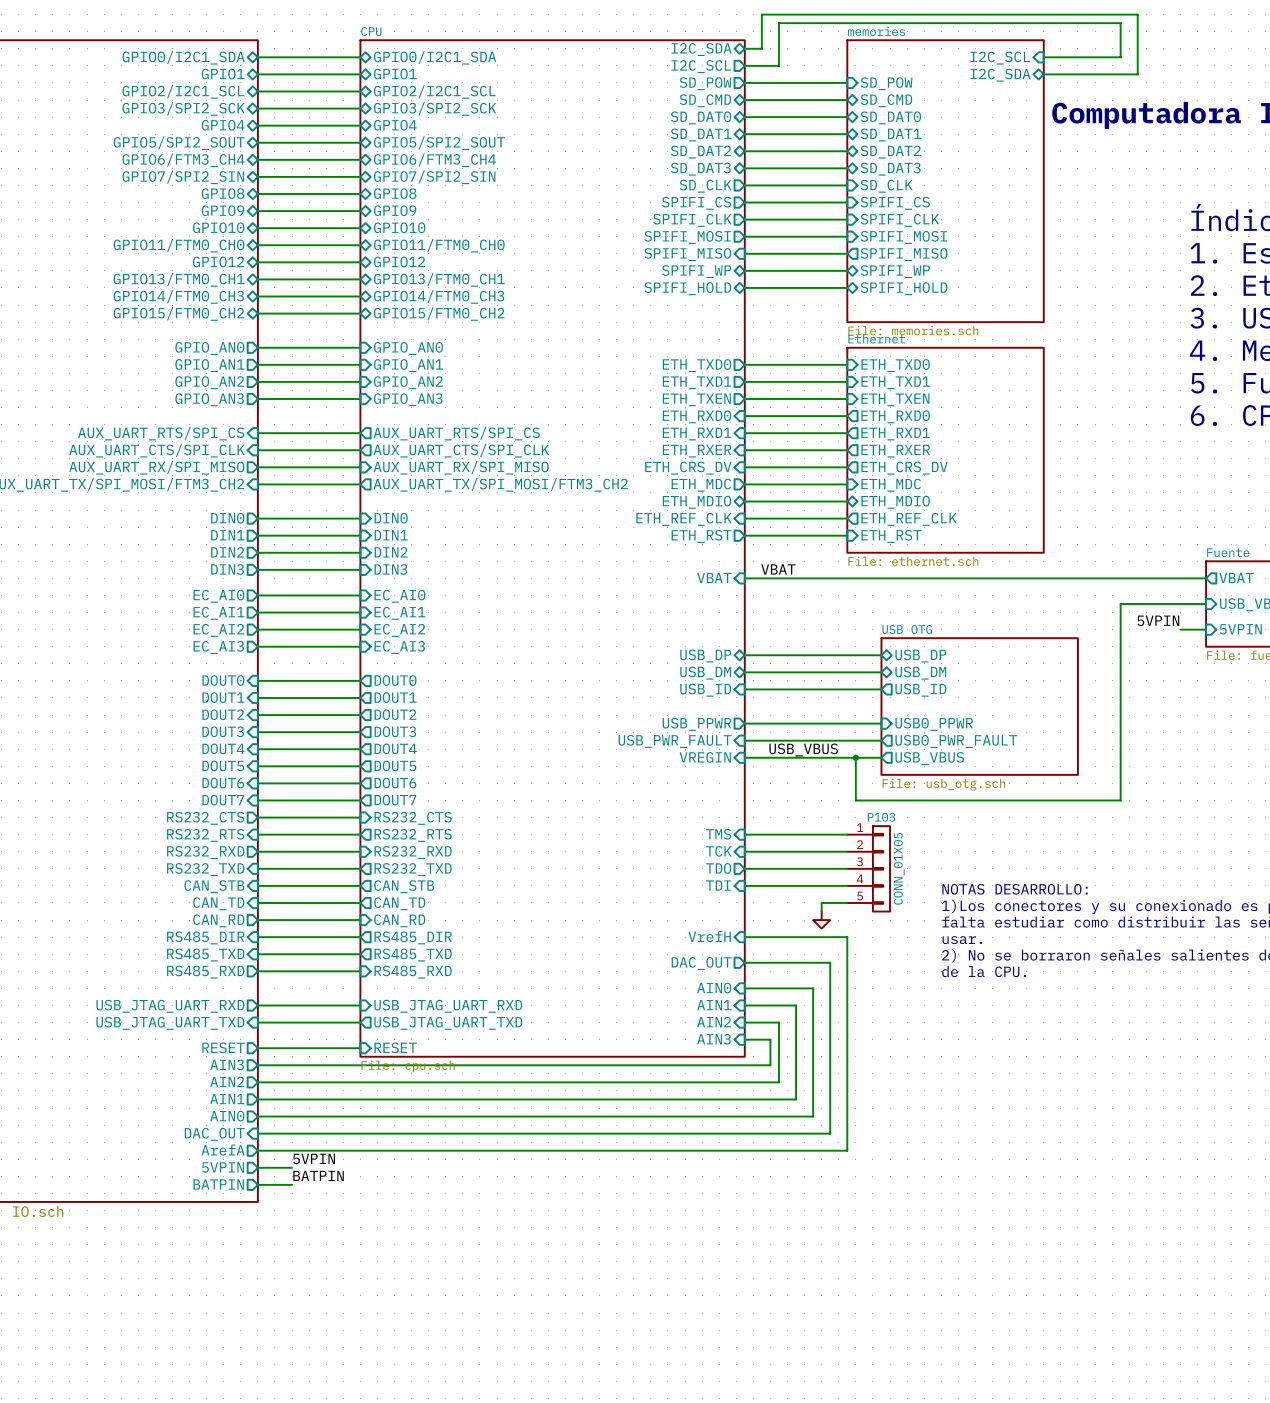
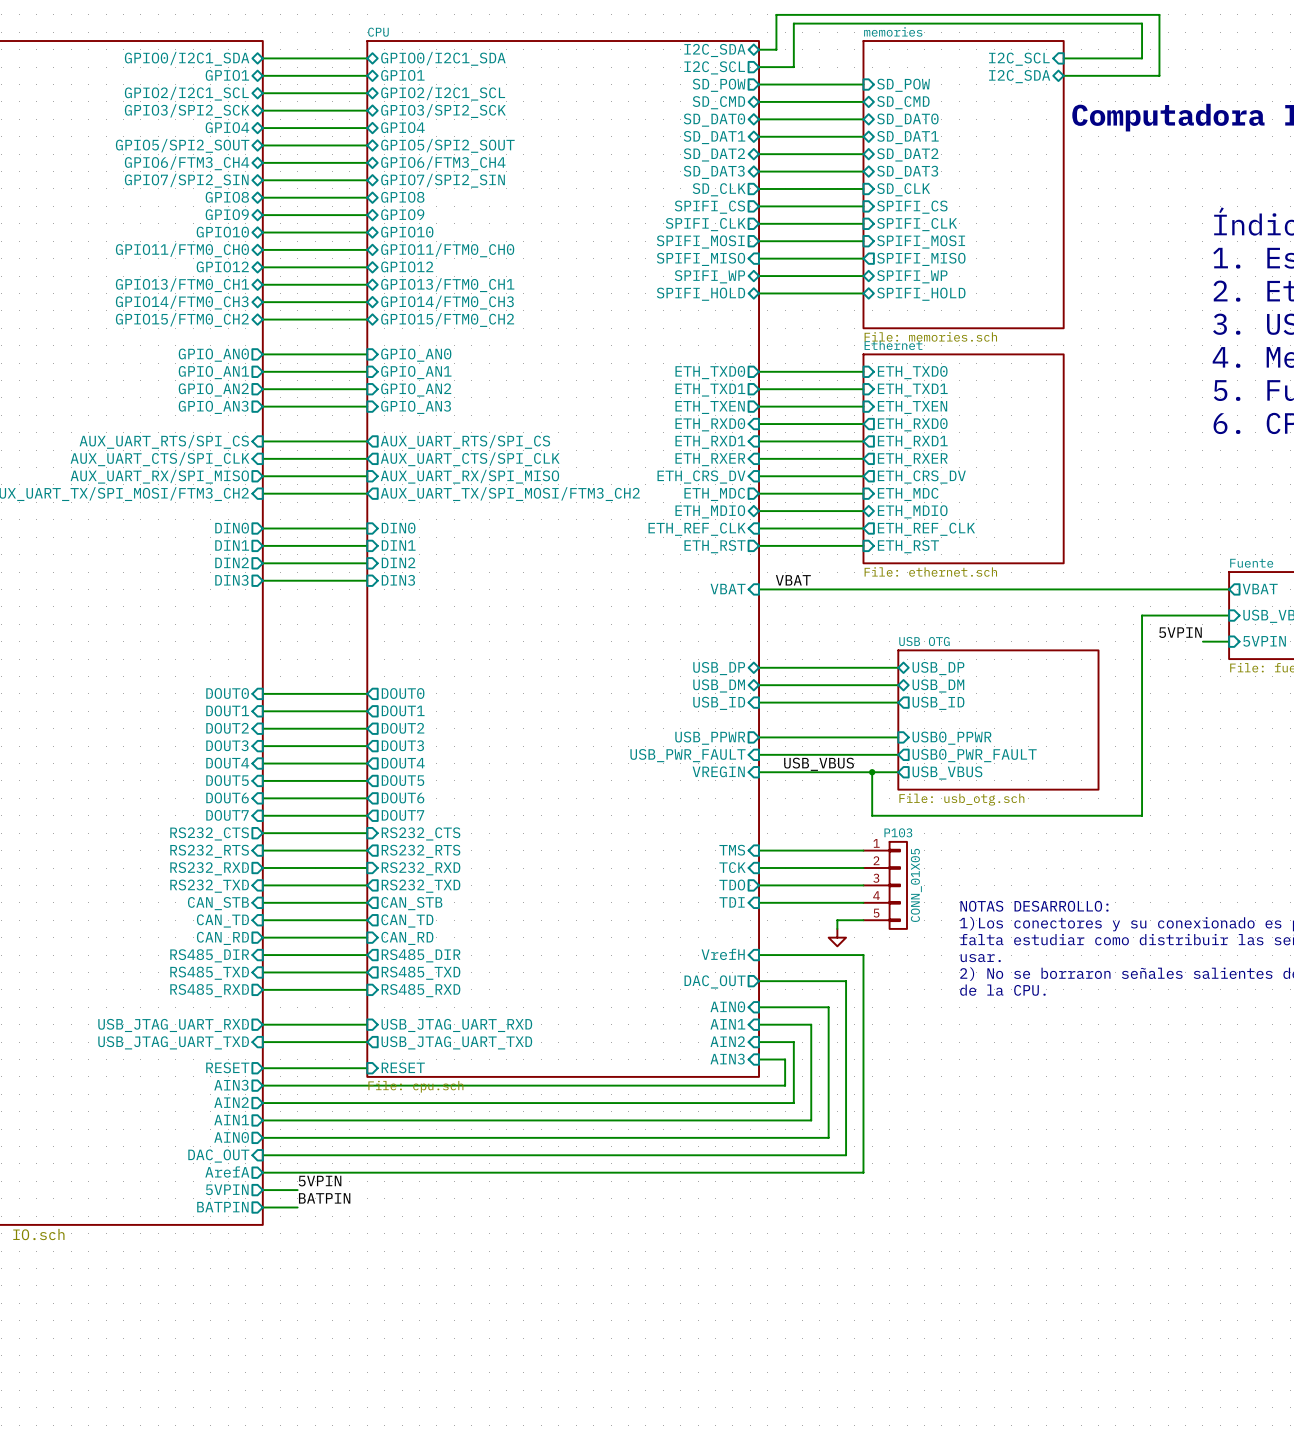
wire: (257, 595) (360, 595) -> none
sheet pin: EC_AI0 (218, 596) -> none
sheet pin: EC_AI0 (399, 596) -> none
wire: (257, 612) (360, 612) -> none
sheet pin: EC_AI1 (218, 613) -> none
sheet pin: EC_AI1 (399, 613) -> none
wire: (257, 629) (360, 629) -> none
sheet pin: EC_AI2 (218, 630) -> none
sheet pin: EC_AI2 (399, 630) -> none
wire: (257, 646) (360, 646) -> none
sheet pin: EC_AI3 (218, 647) -> none
sheet pin: EC_AI3 (399, 647) -> none

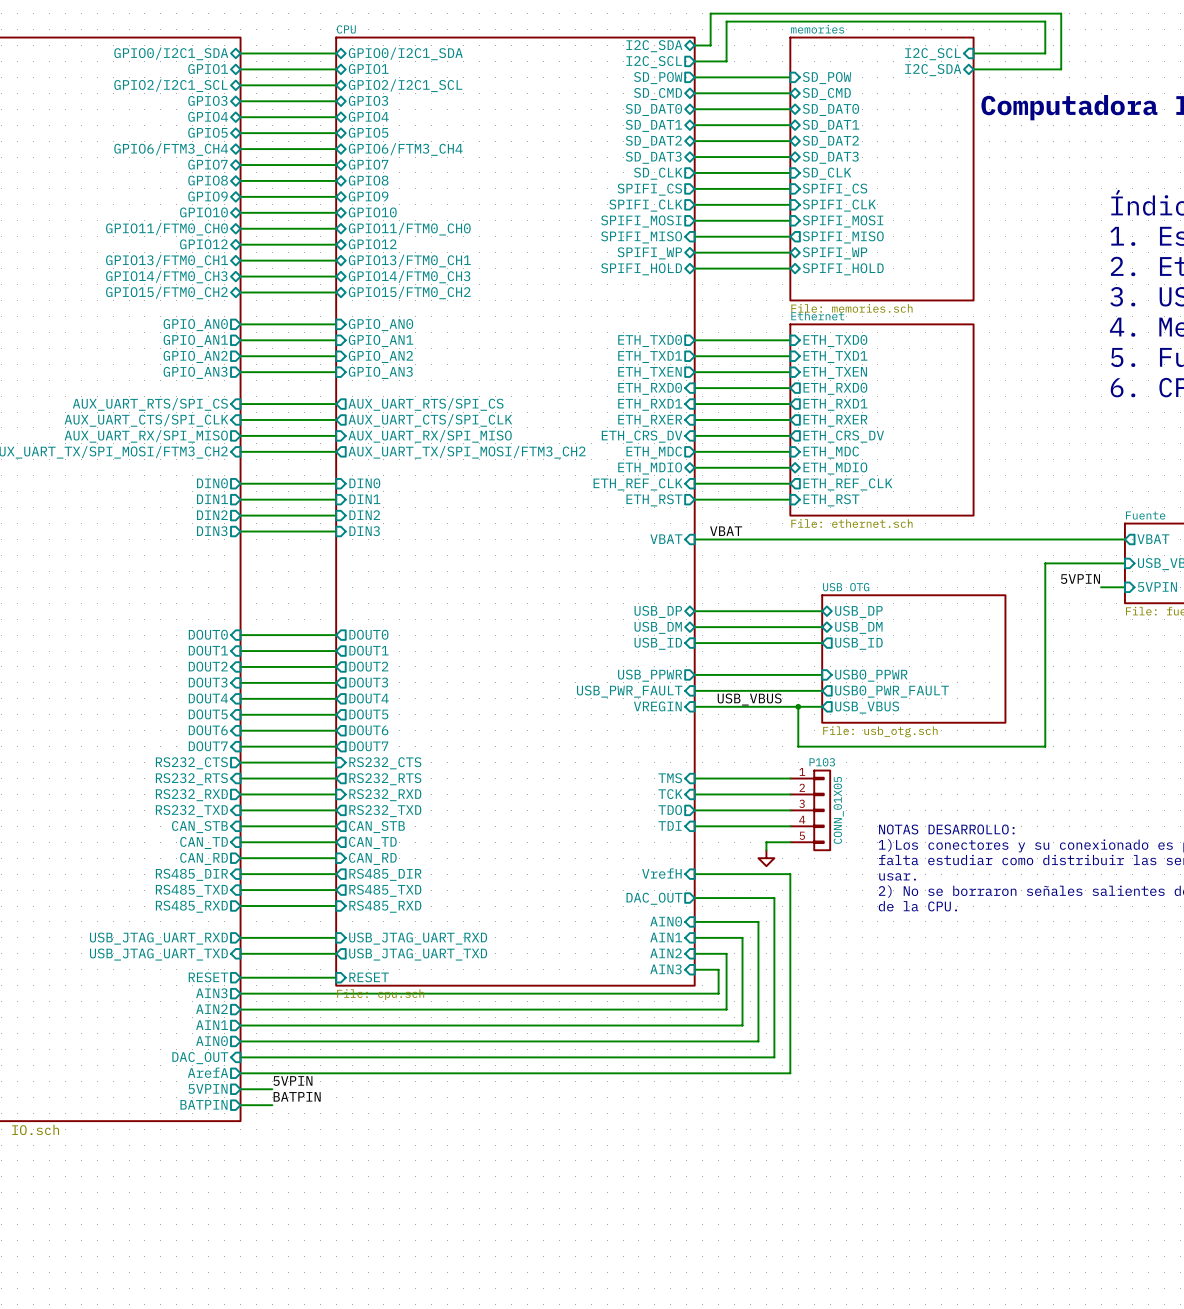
sheet pin: GPIO3/SPI2_SCK (187, 111) -> GPIO3 (207, 100)
sheet pin: GPIO3/SPI2_SCK (443, 111) -> GPIO3 (368, 100)
sheet pin: GPIO5/SPI2_SOUT (182, 145) -> GPIO5 (207, 132)
sheet pin: GPIO5/SPI2_SOUT (447, 145) -> GPIO5 (368, 132)
sheet pin: GPIO7/SPI2_SIN (186, 180) -> GPIO7 (207, 164)
sheet pin: GPIO7/SPI2_SIN (443, 180) -> GPIO7 (368, 164)

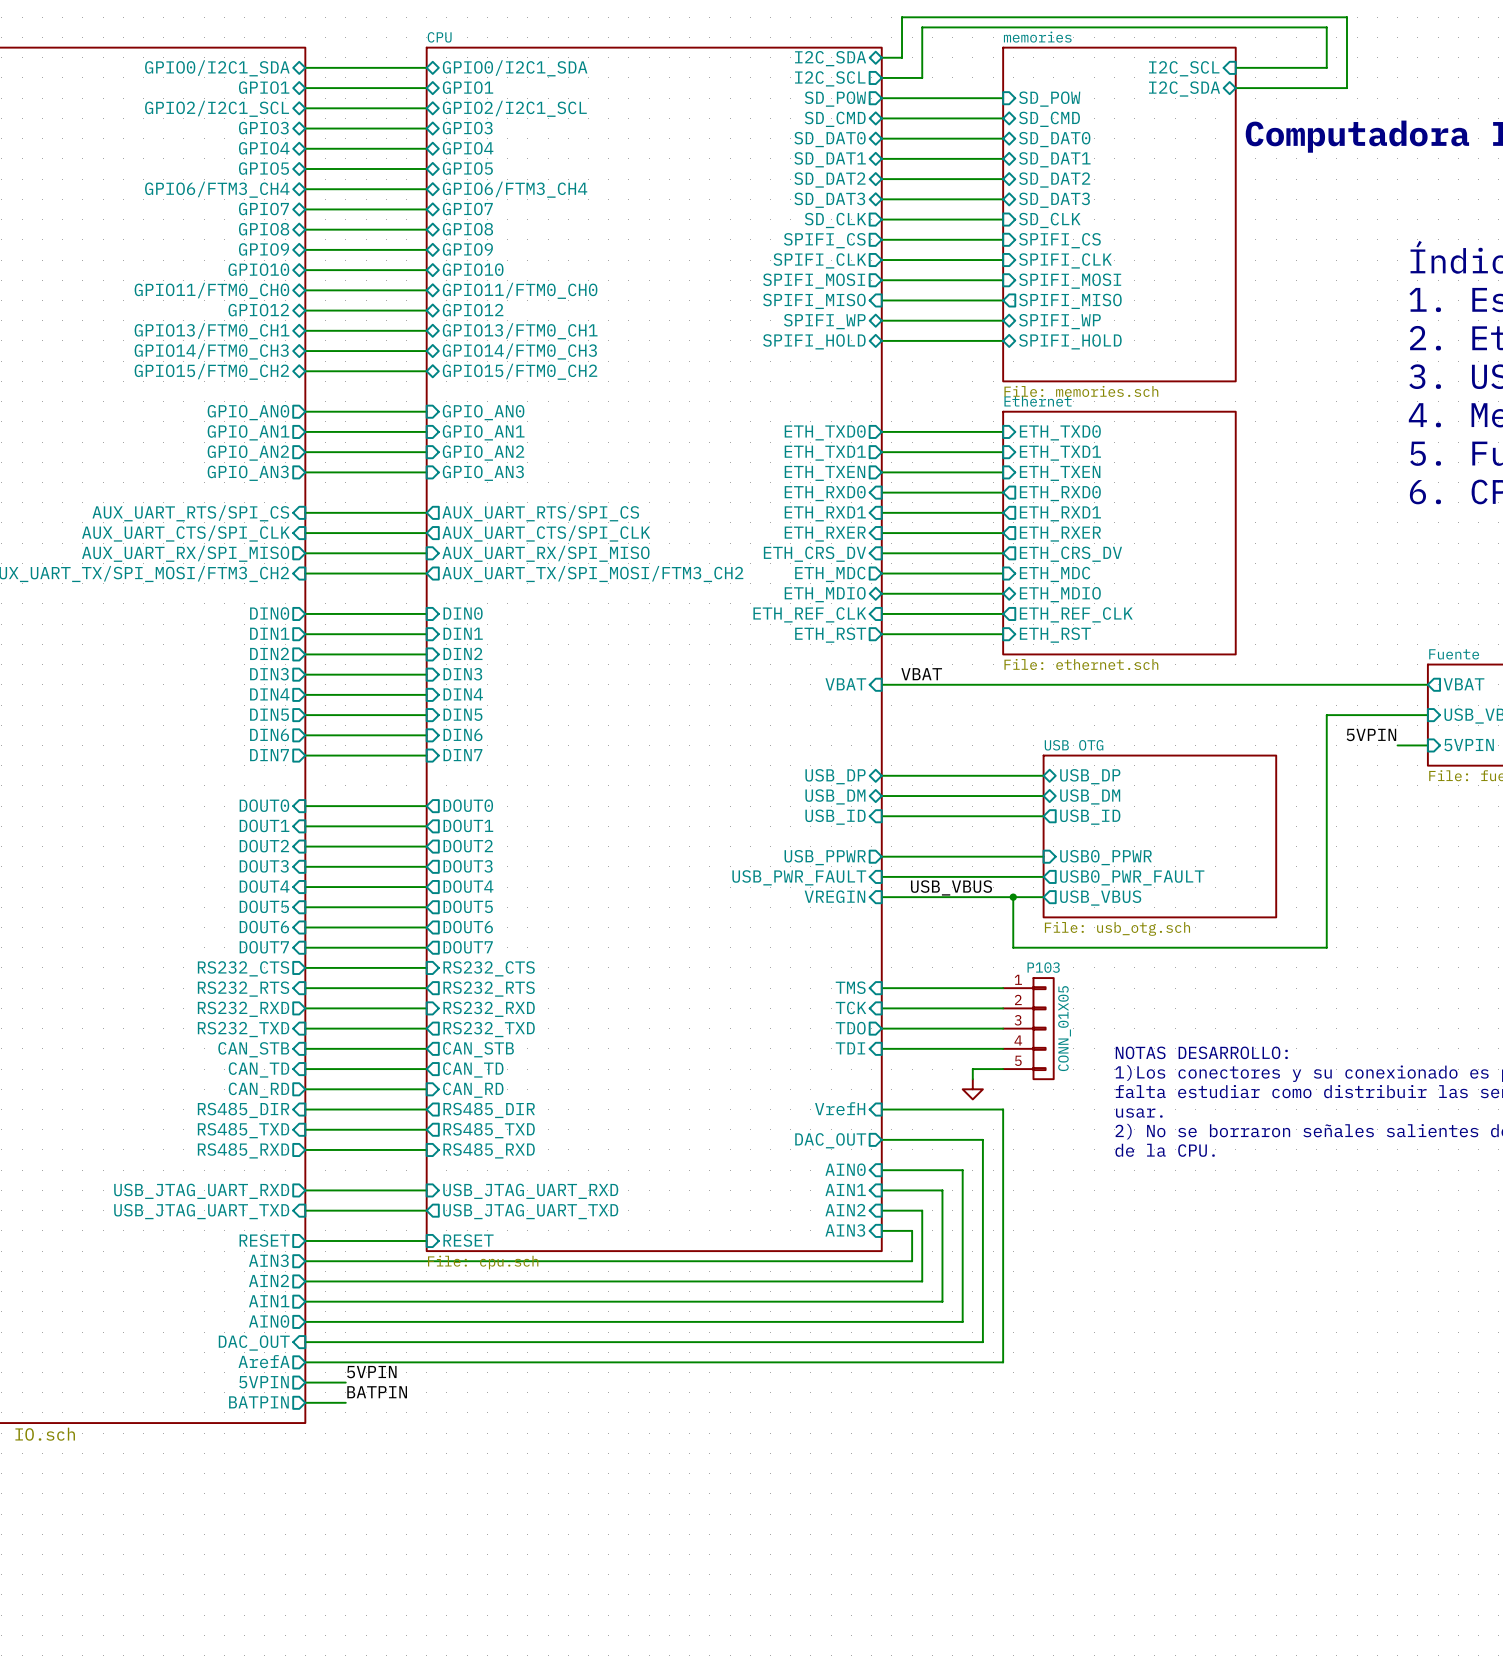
sheet pin: none -> DIN4 (269, 694)
wire: none -> (305, 694) (426, 694)
sheet pin: none -> DIN4 (463, 694)
sheet pin: none -> DIN5 (269, 714)
wire: none -> (305, 715) (426, 715)
sheet pin: none -> DIN5 (462, 714)
sheet pin: none -> DIN6 (269, 734)
wire: none -> (305, 735) (426, 735)
sheet pin: none -> DIN6 (462, 734)
sheet pin: none -> DIN7 (269, 755)
sheet pin: none -> DIN7 (462, 755)
wire: none -> (305, 755) (426, 755)

